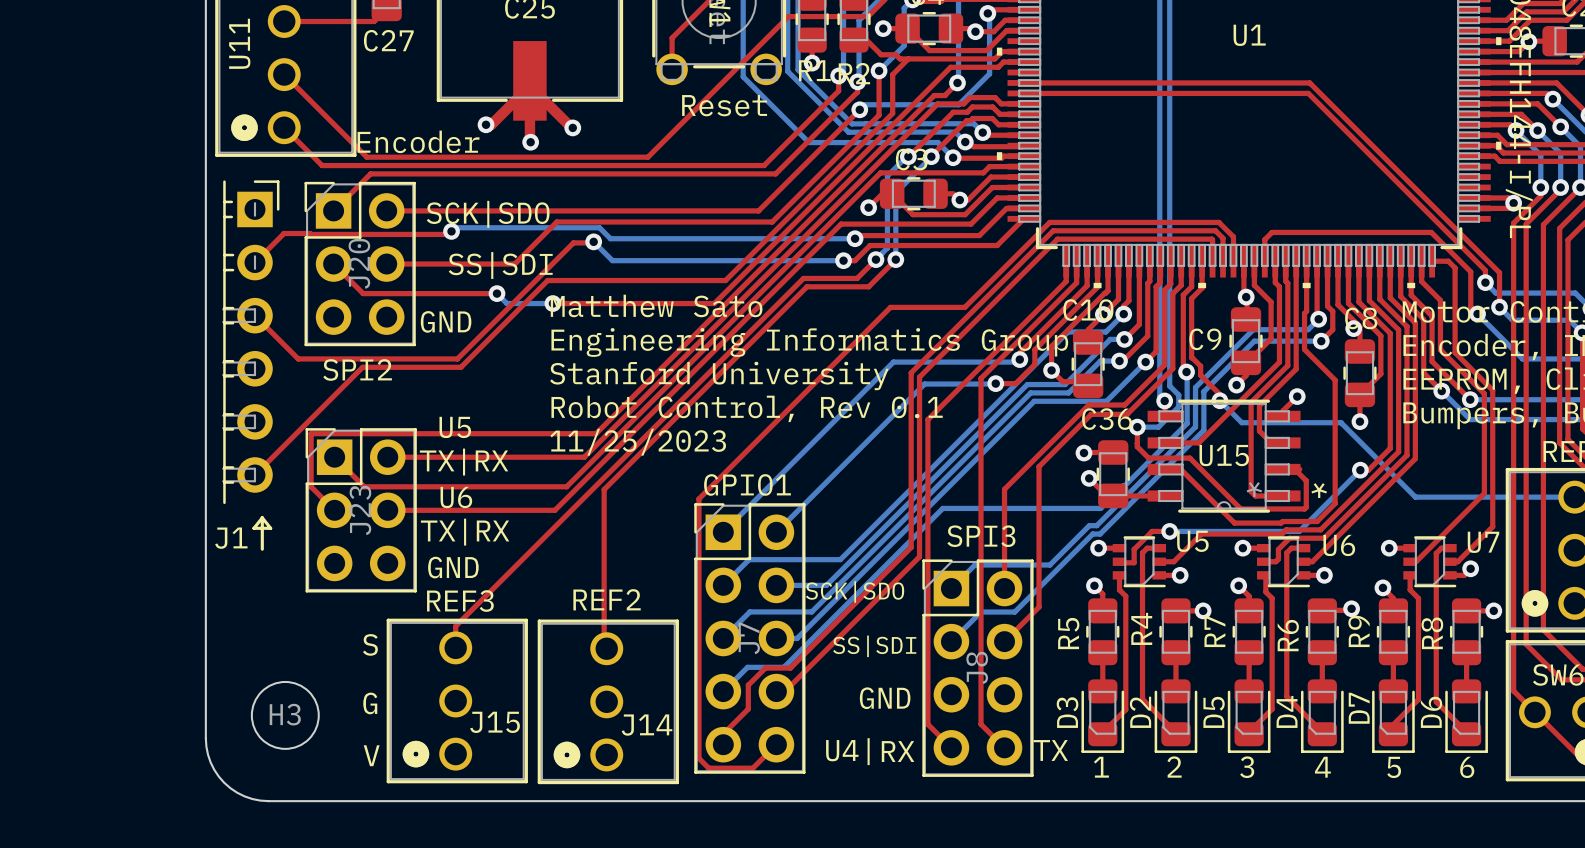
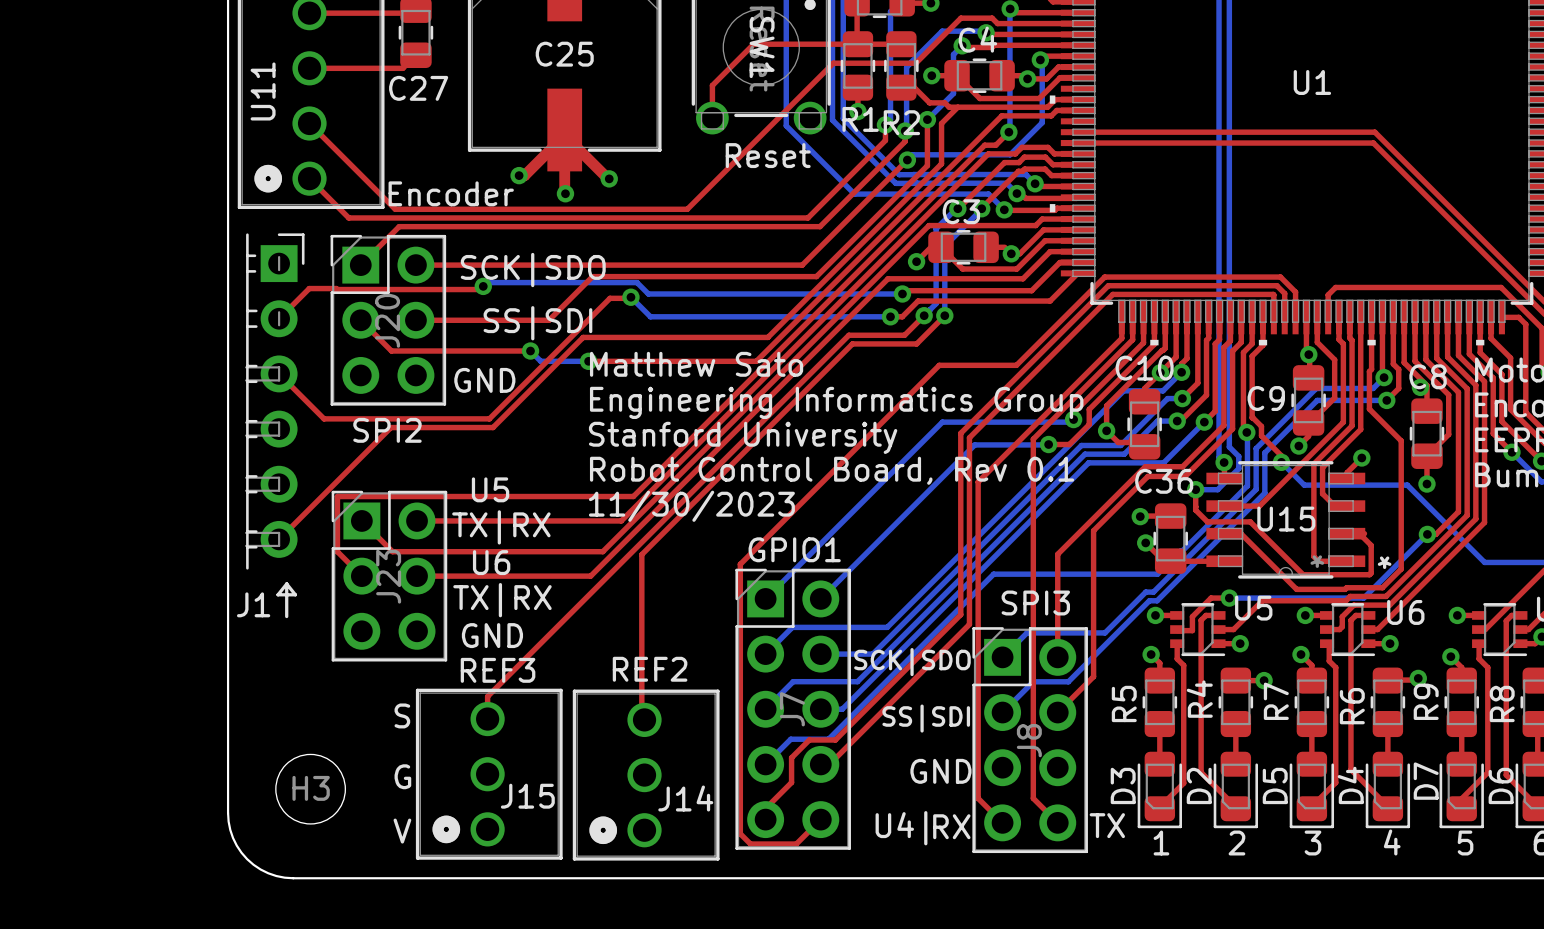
text: Robot Control, Rev 0.1 (747, 408) -> Robot Control Board, Rev 0.1 (832, 470)
text: 11/25/2023 (638, 442) -> 11/30/2023 (691, 506)

